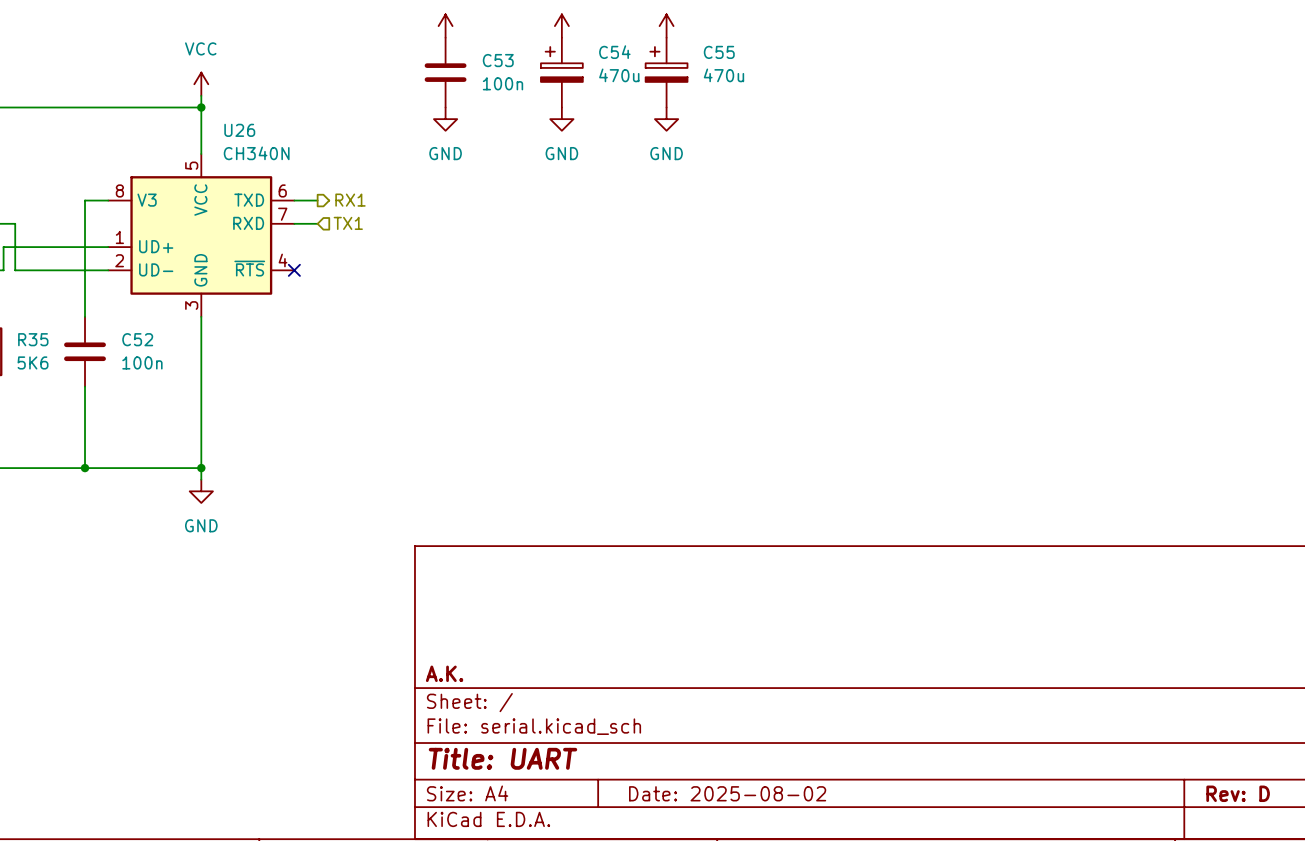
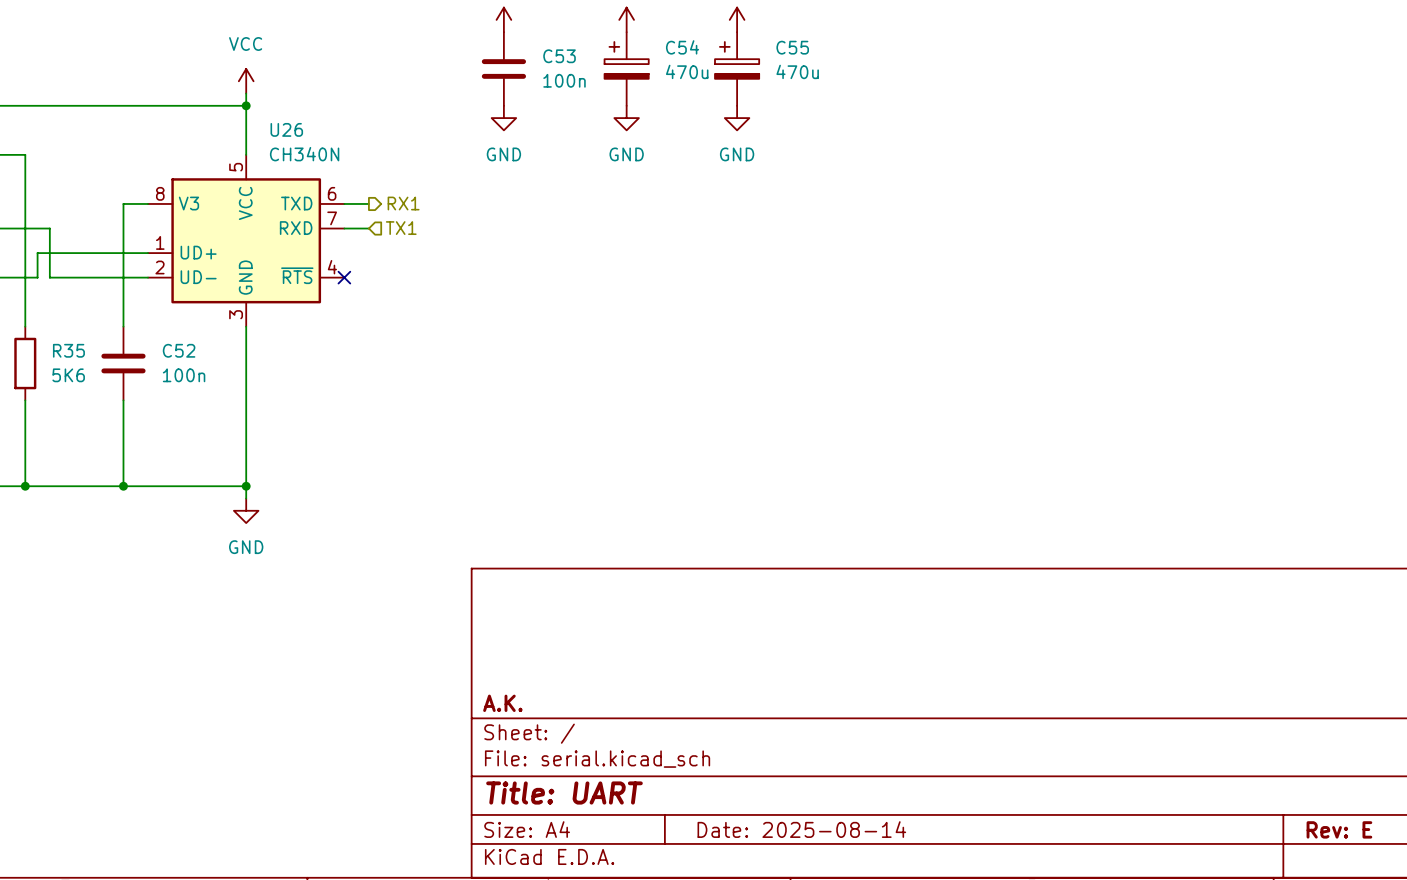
title block: Date: 2025-08-02 (727, 793) -> Date: 2025-08-14 (801, 829)
title block: Rev: D (1238, 793) -> Rev: E (1339, 829)

